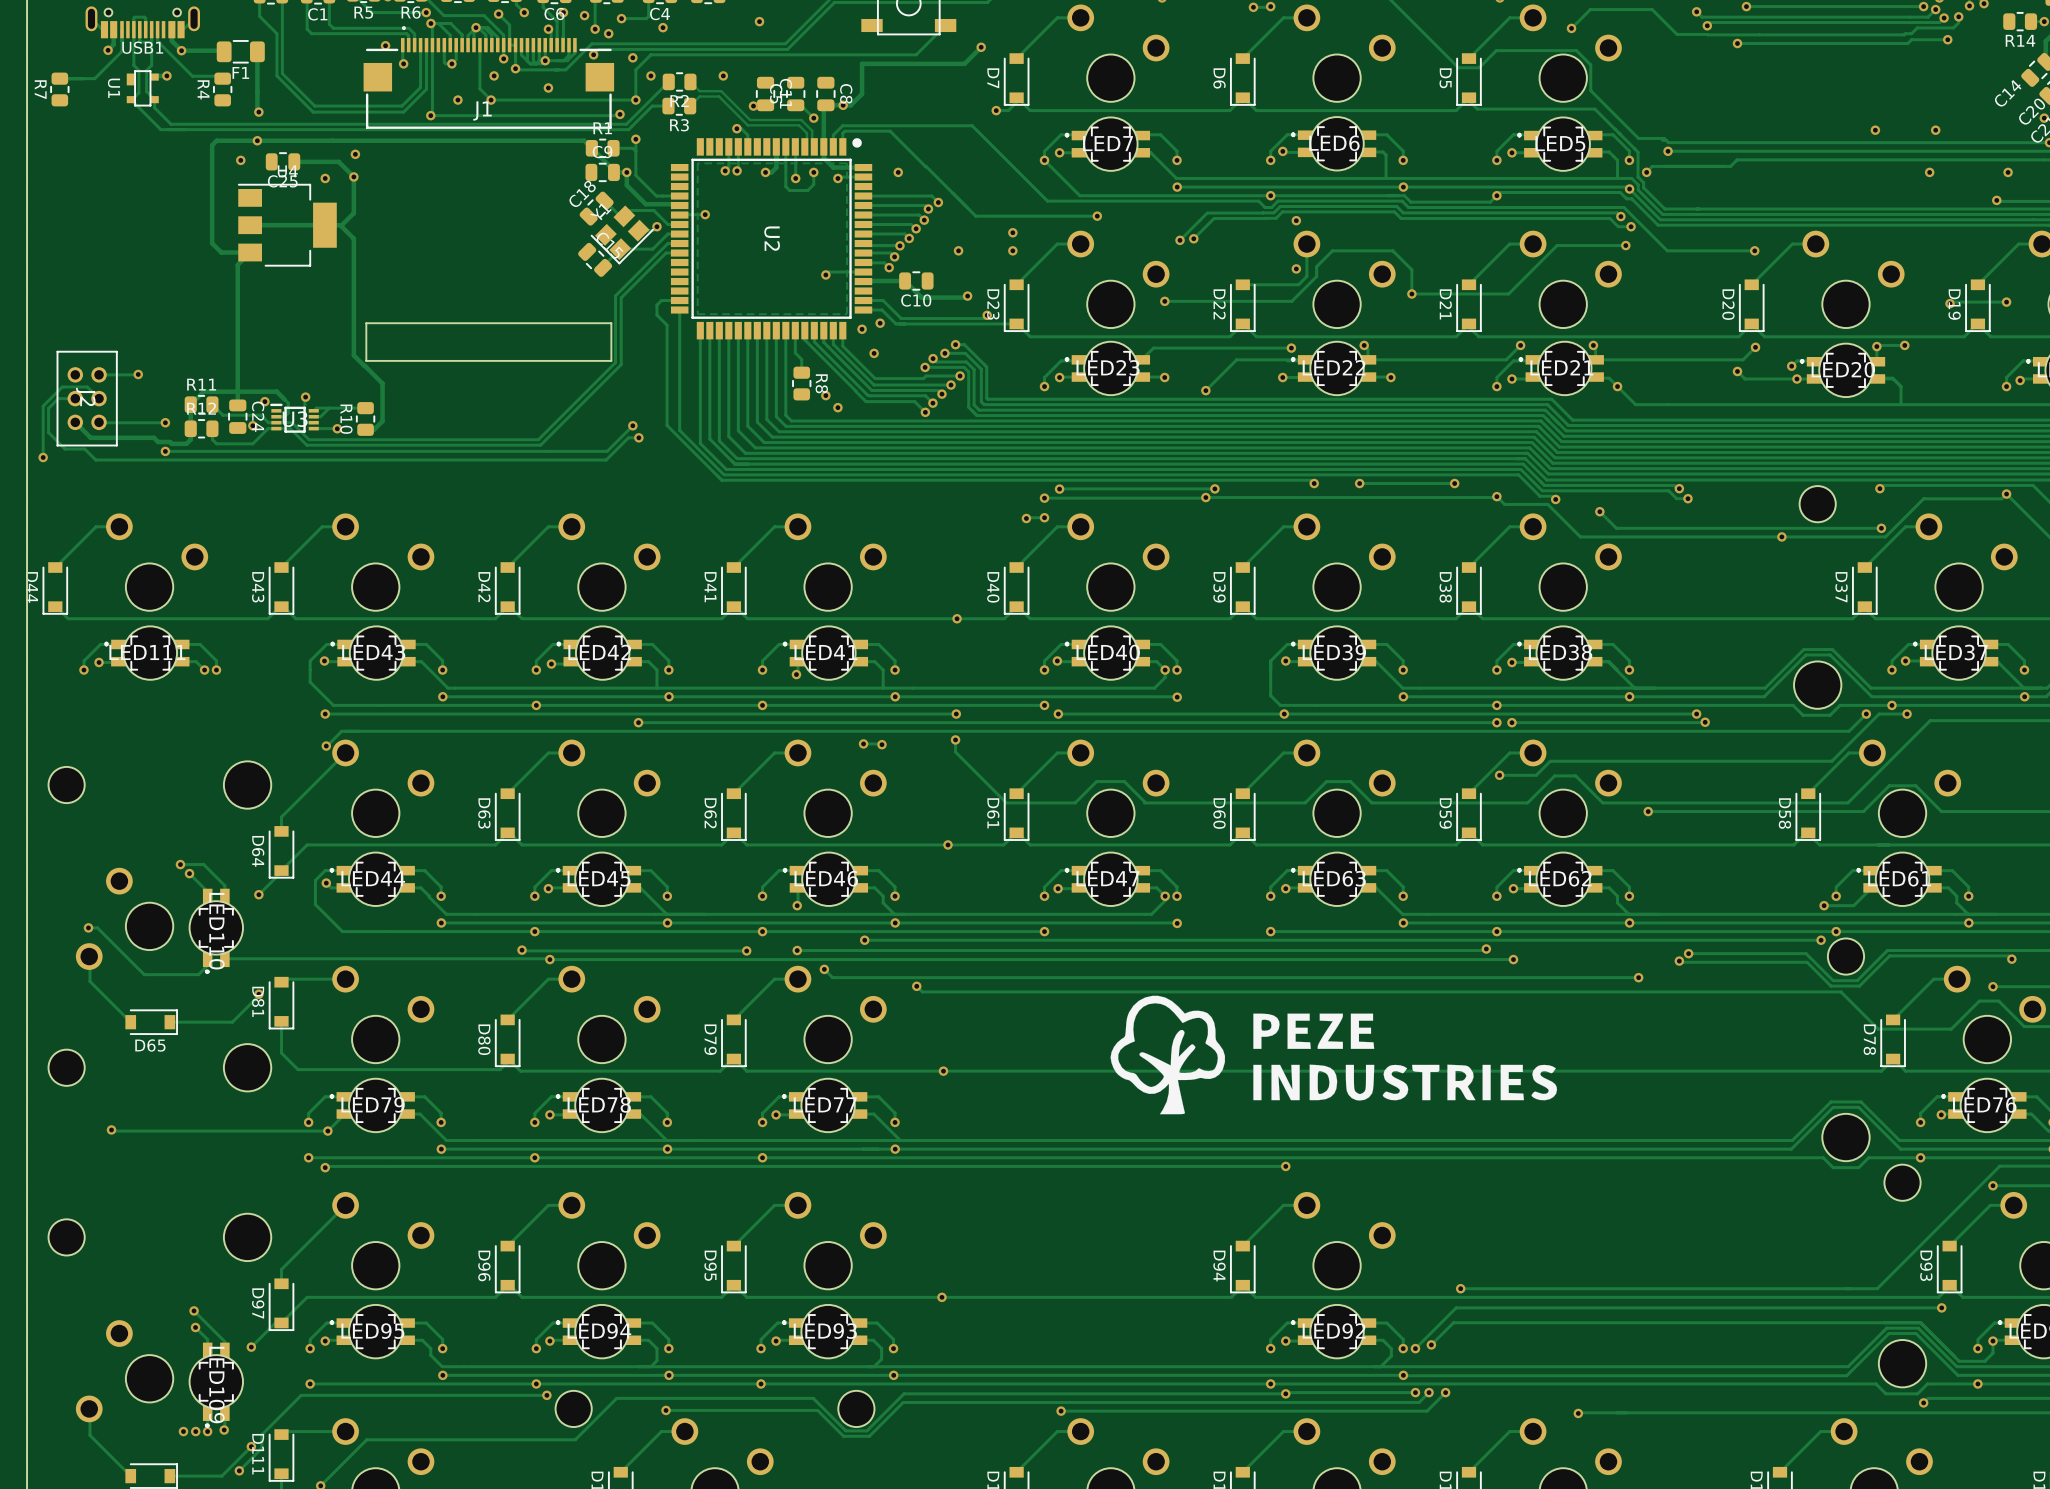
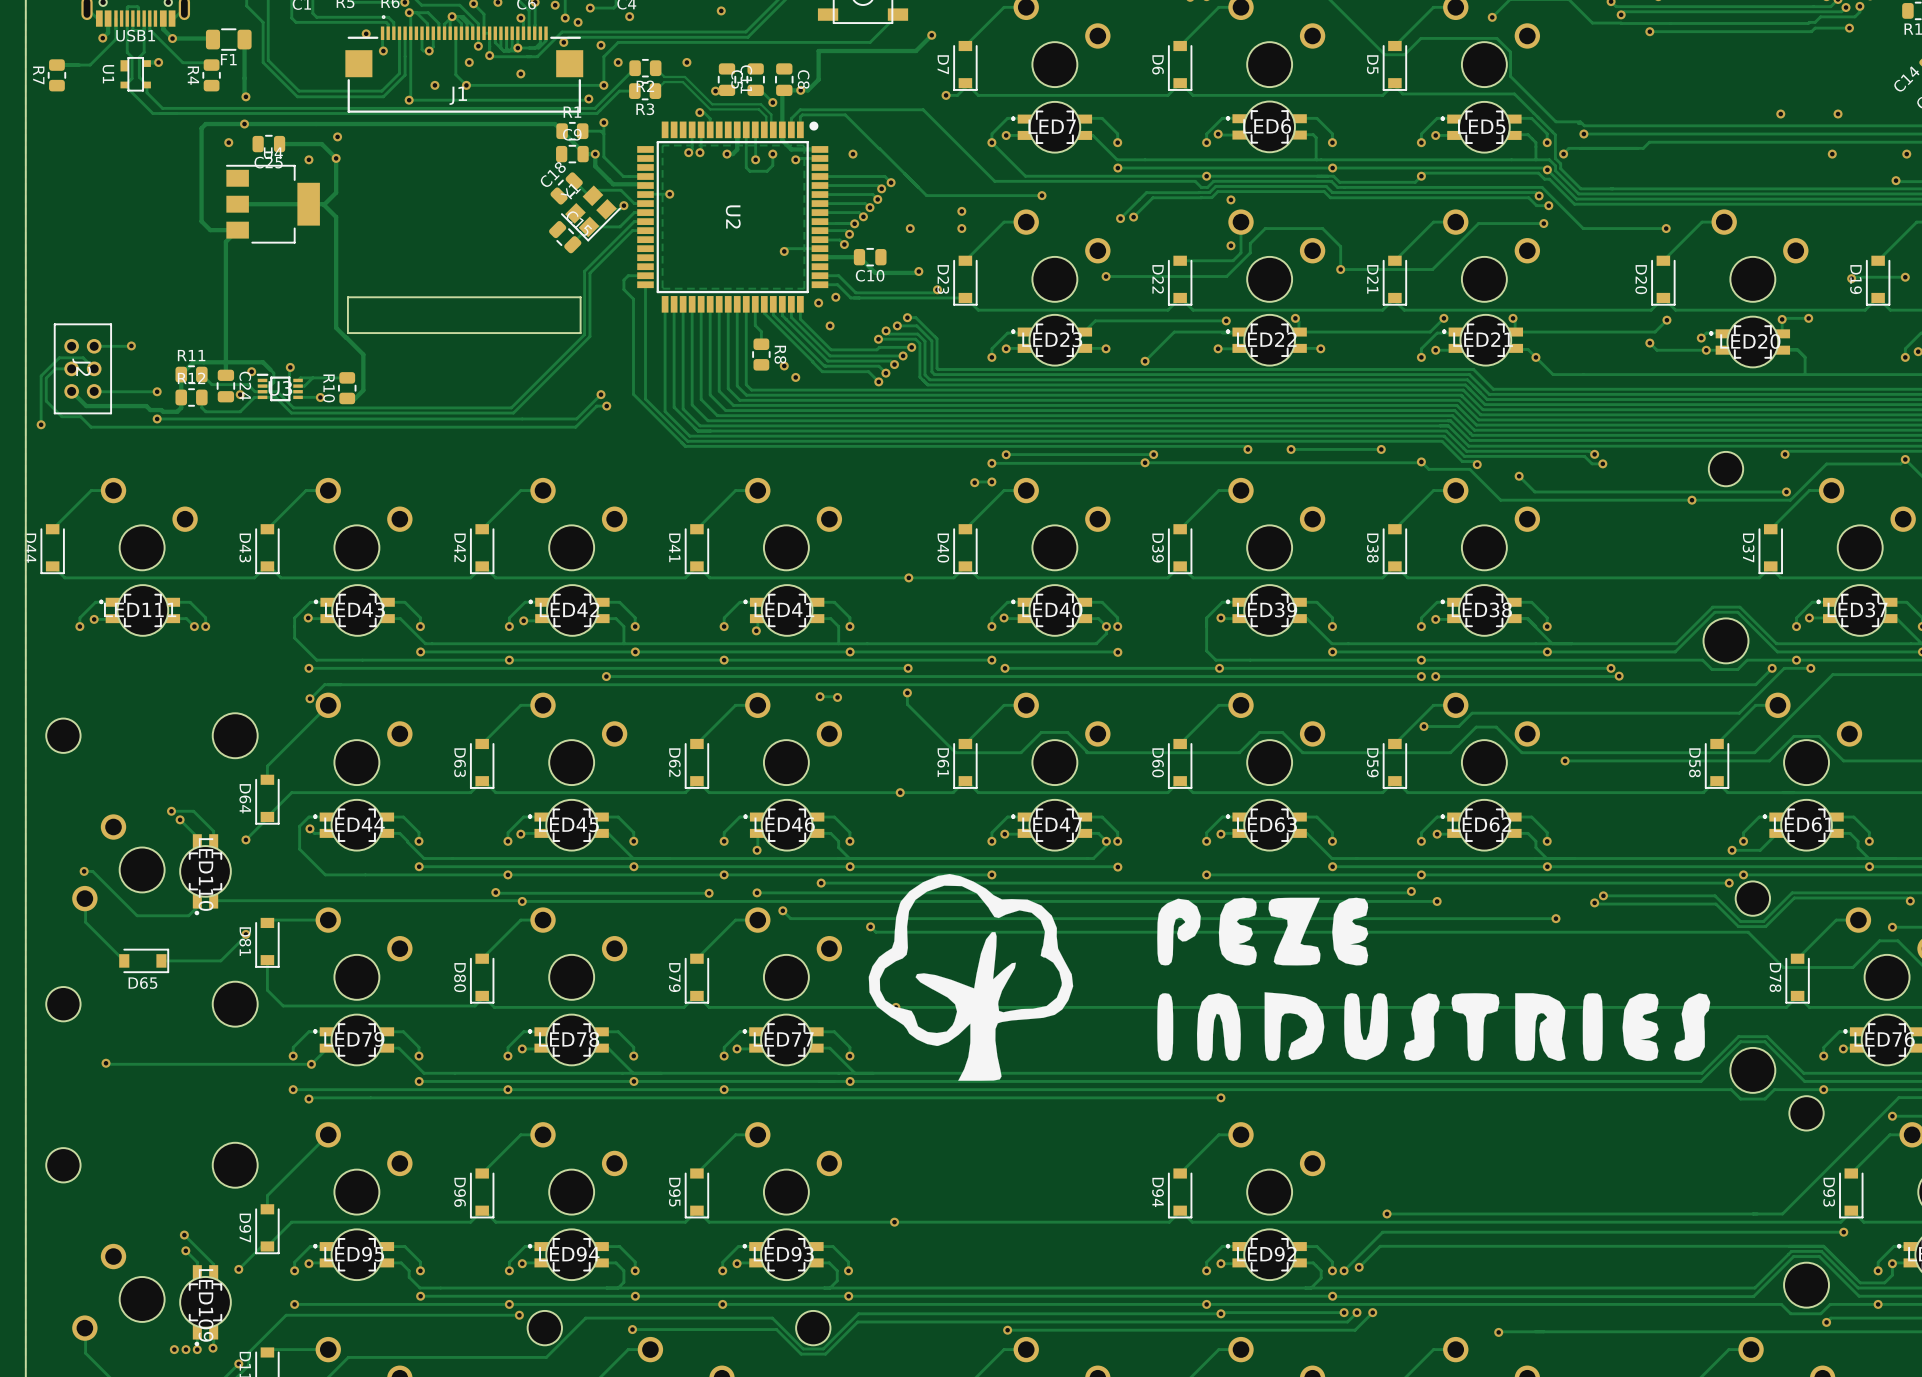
drawing: none -> [868, 873, 1711, 1081]
drawing: [1110, 995, 1558, 1115] -> none

